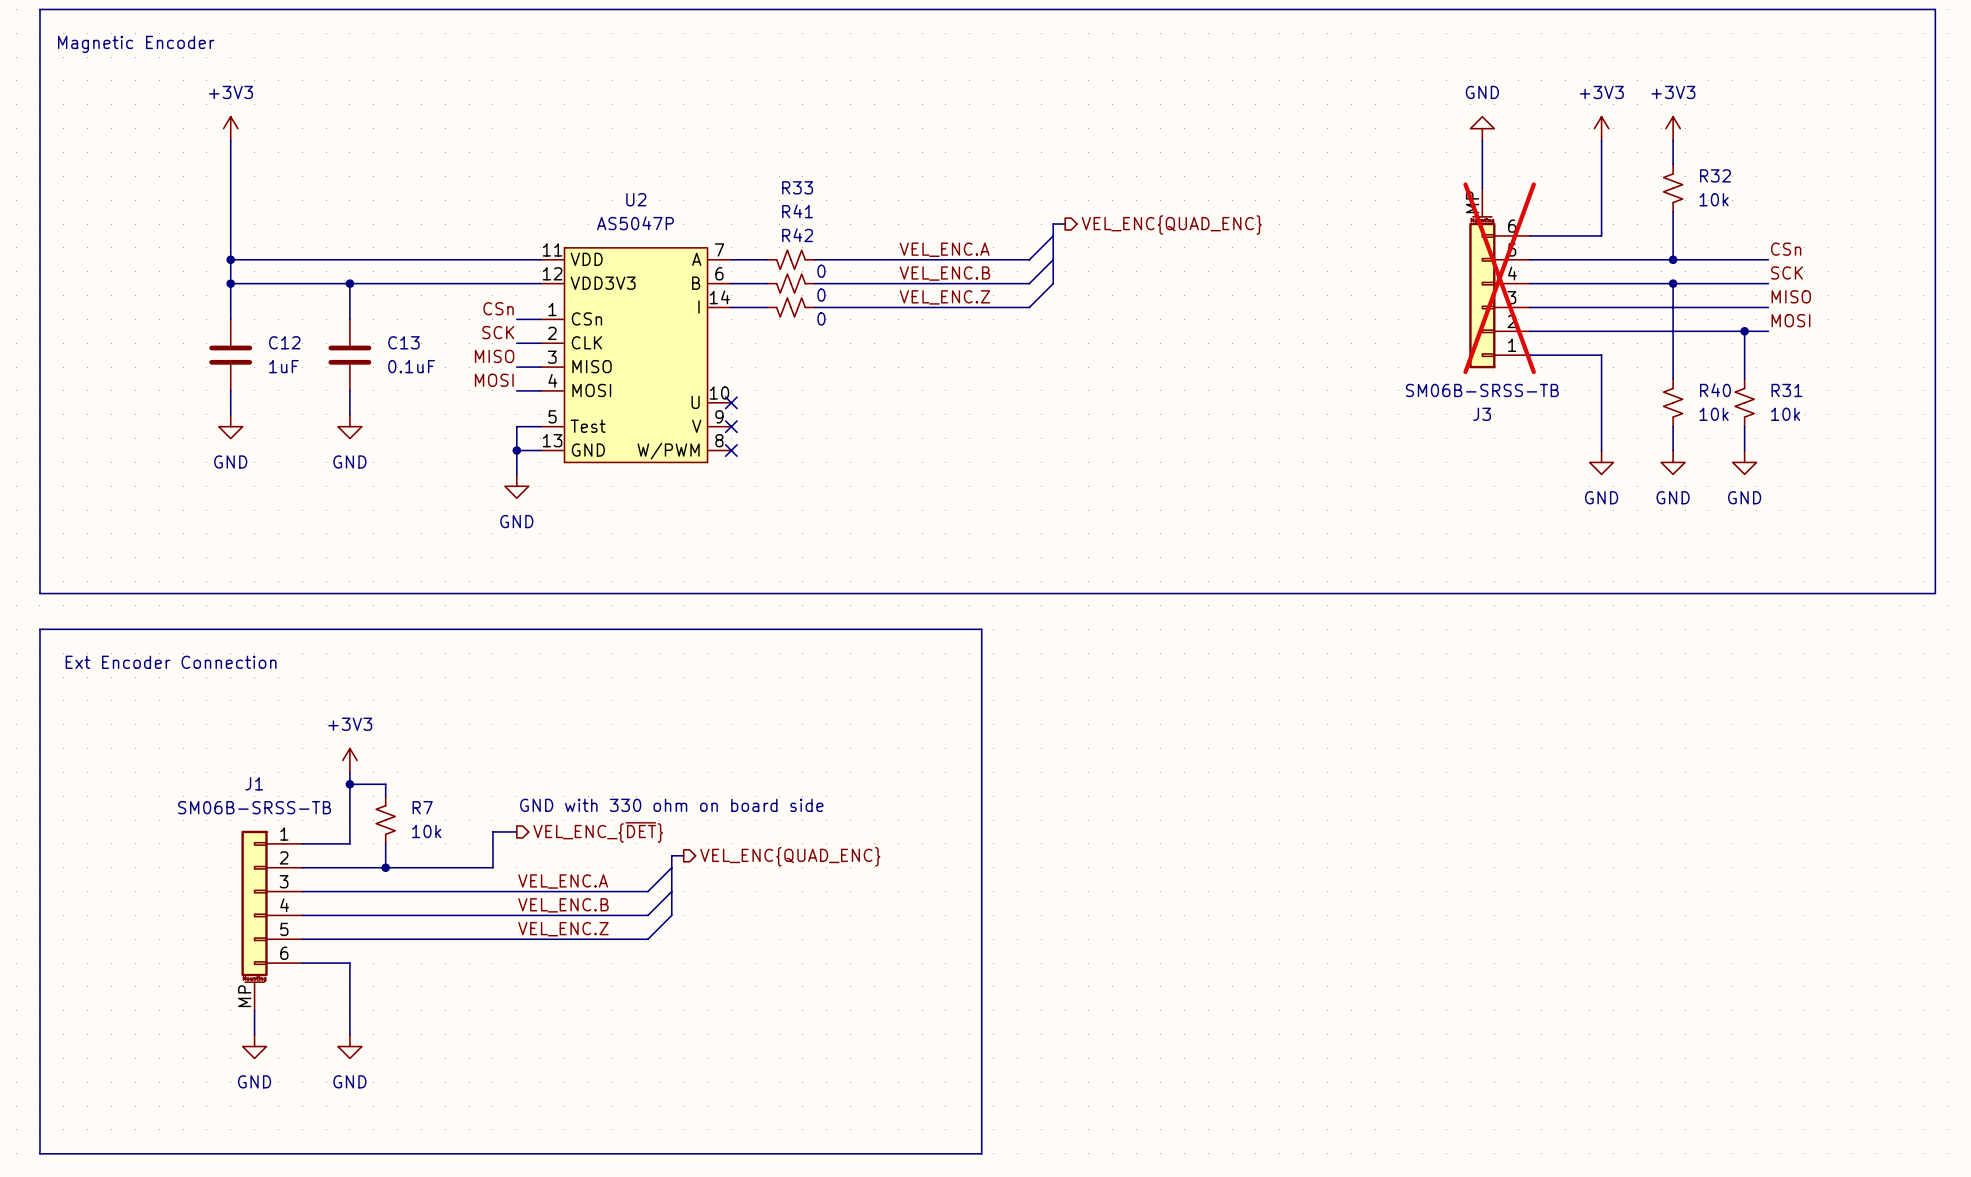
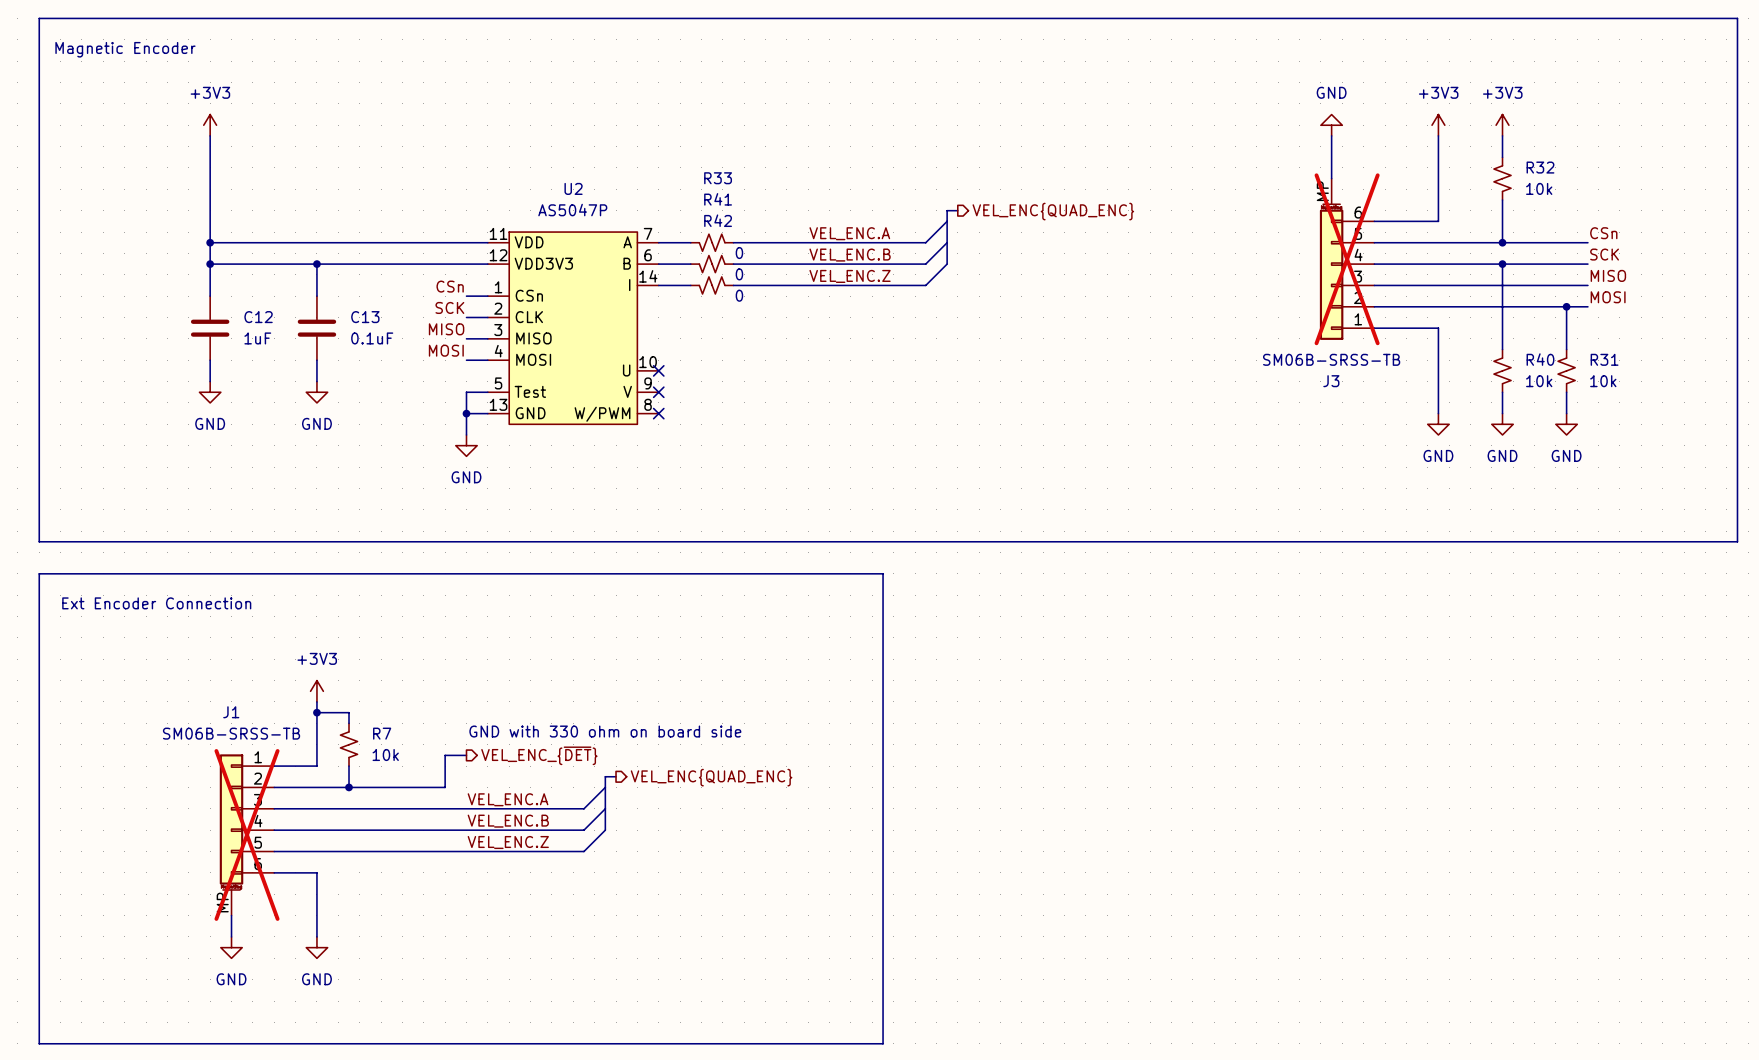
J1 do-not-place cross: none -> (247, 834)

